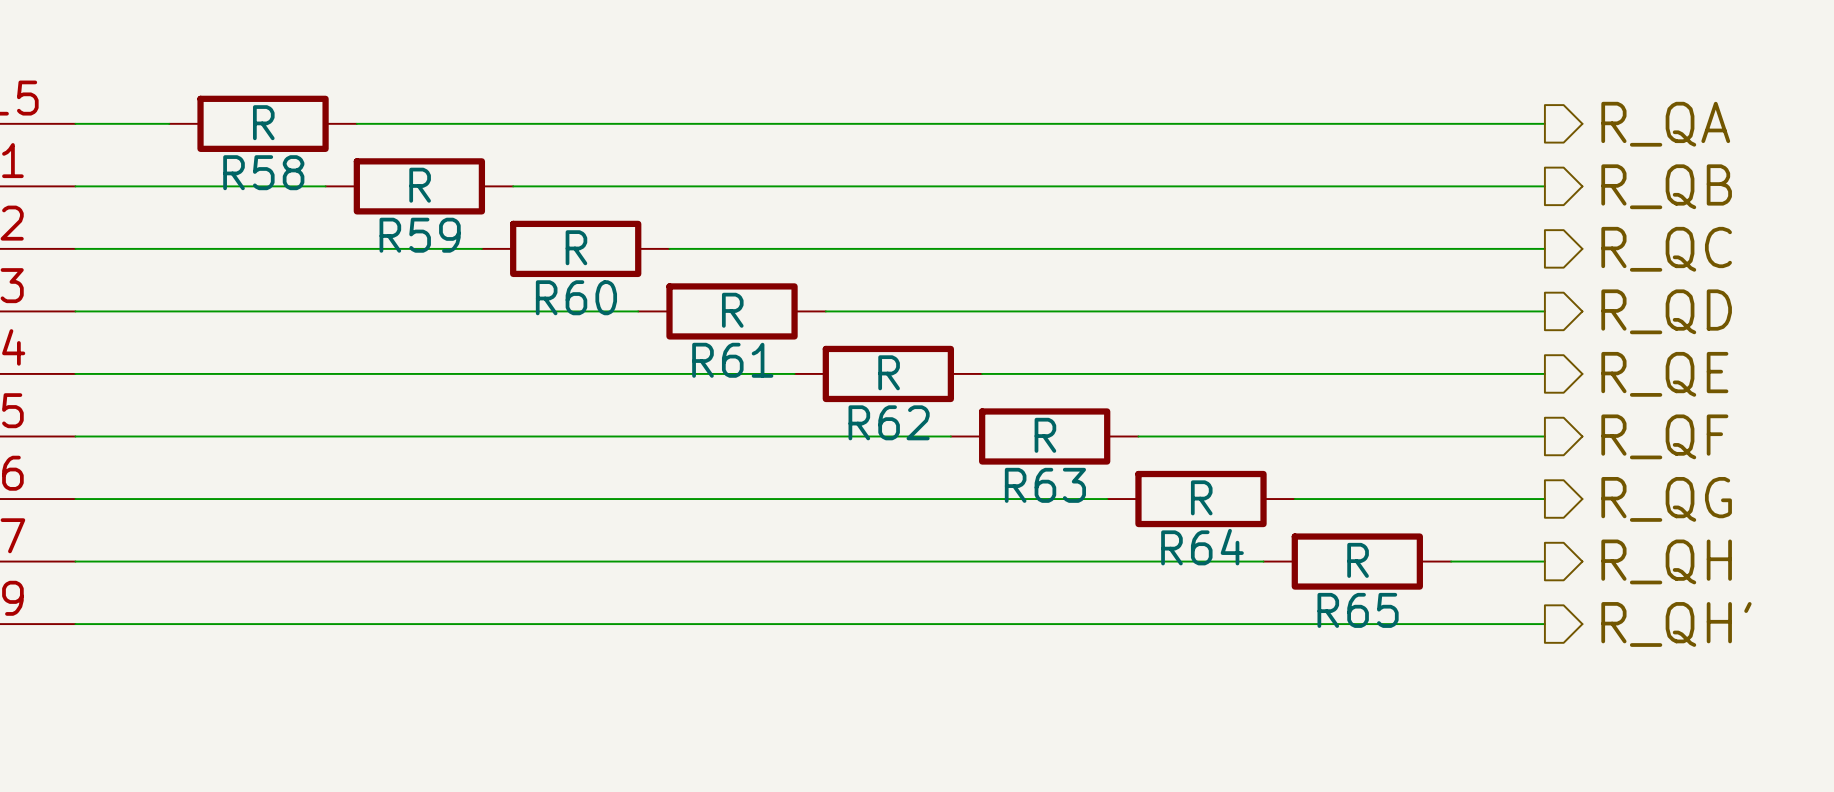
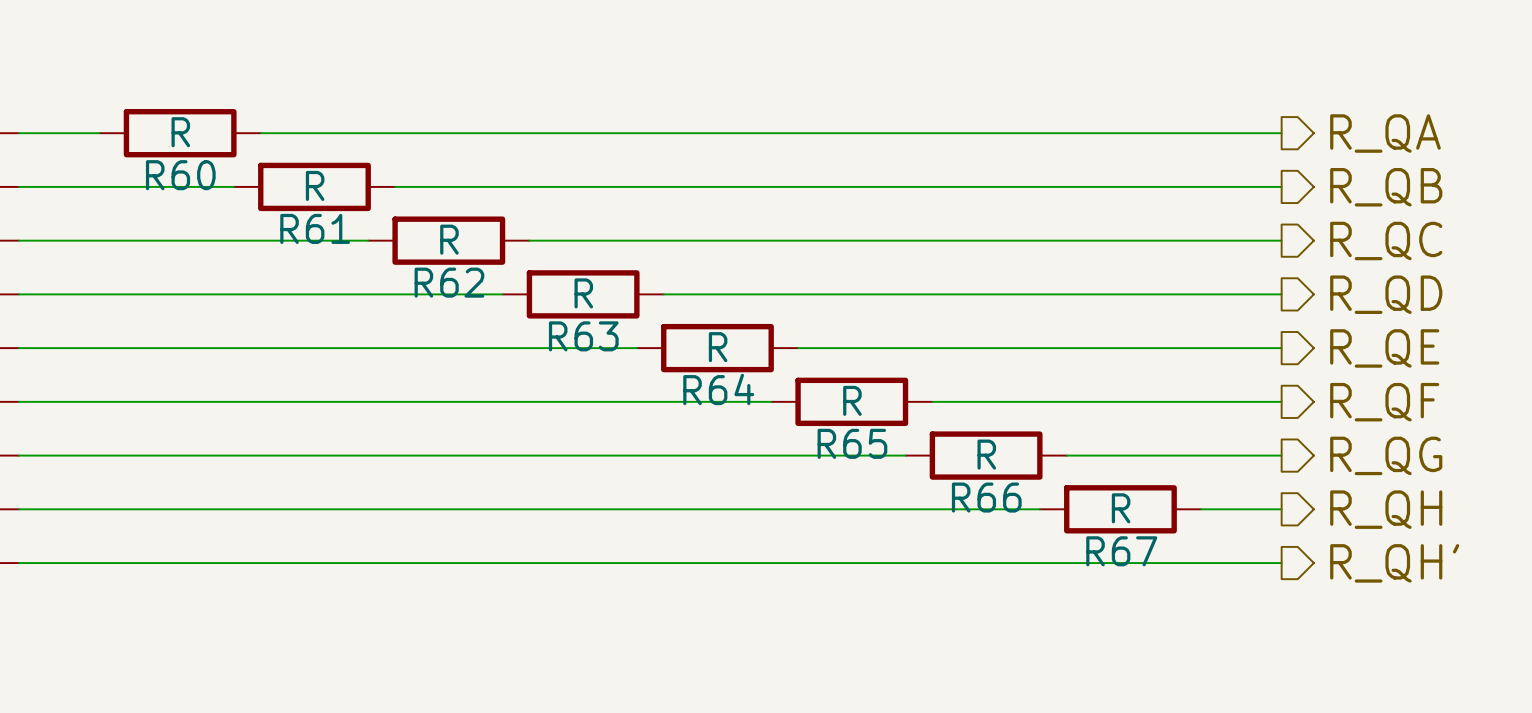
R58 name: R58 (263, 172) -> R60 (180, 175)
R59 name: R59 (420, 235) -> R61 (315, 228)
R60 name: R60 (576, 297) -> R62 (449, 282)
R61 name: R61 (732, 360) -> R63 (583, 336)
R62 name: R62 (889, 422) -> R64 (718, 389)
R63 name: R63 (1045, 485) -> R65 (852, 443)
R64 name: R64 (1202, 547) -> R66 (986, 497)
R65 name: R65 (1358, 610) -> R67 (1121, 551)

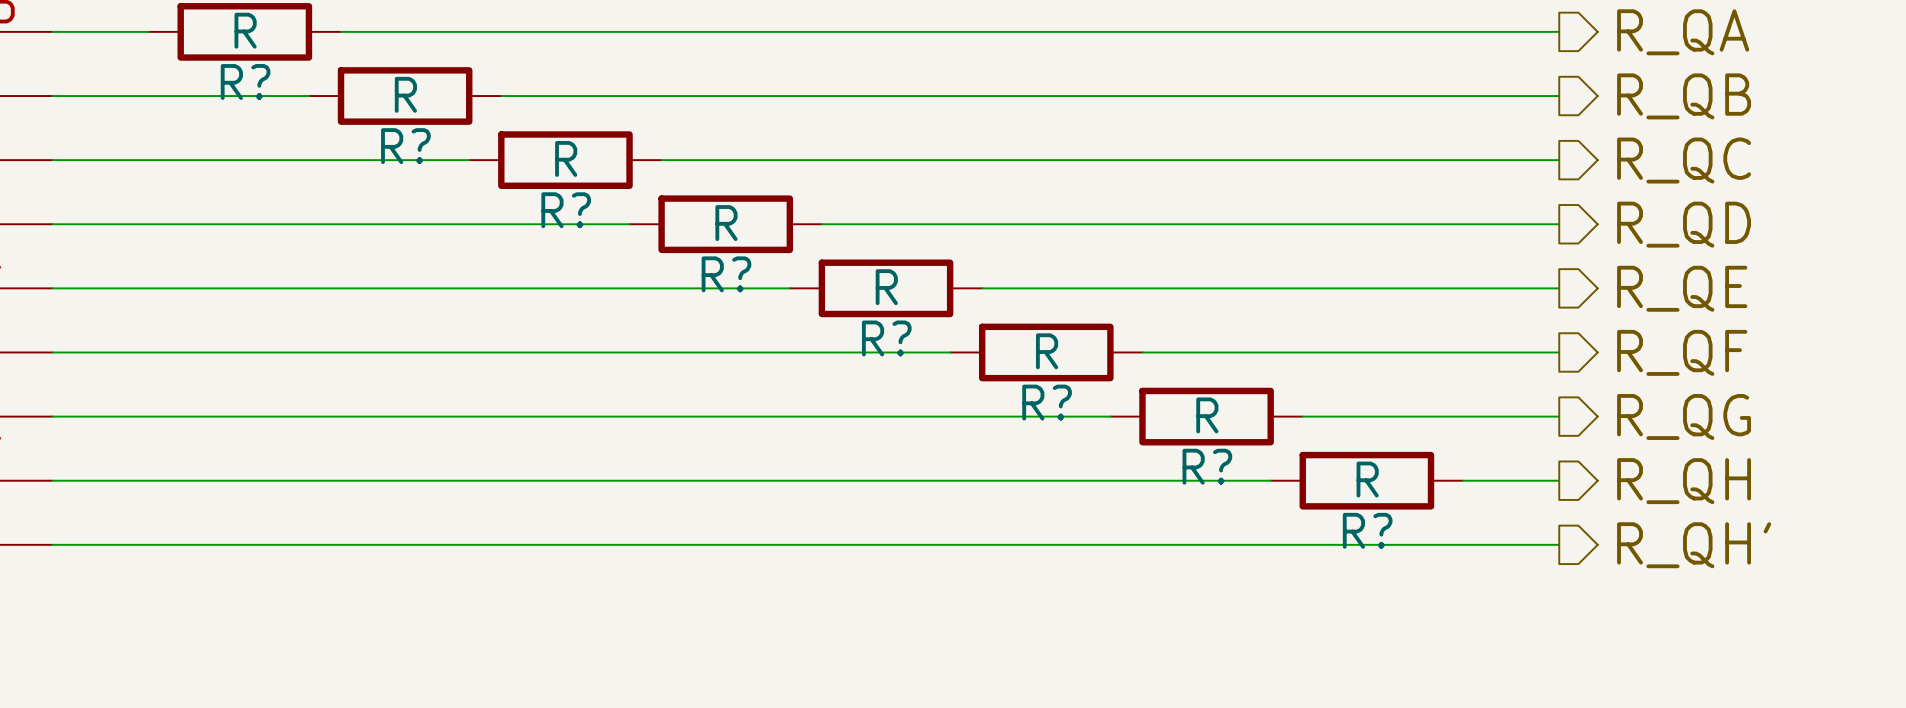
R60 name: R60 (180, 175) -> R? (245, 81)
R61 name: R61 (315, 228) -> R? (405, 146)
R62 name: R62 (449, 282) -> R? (566, 210)
R63 name: R63 (583, 336) -> R? (726, 274)
R64 name: R64 (718, 389) -> R? (886, 338)
R65 name: R65 (852, 443) -> R? (1047, 402)
R66 name: R66 (986, 497) -> R? (1207, 466)
R67 name: R67 (1121, 551) -> R? (1367, 530)

